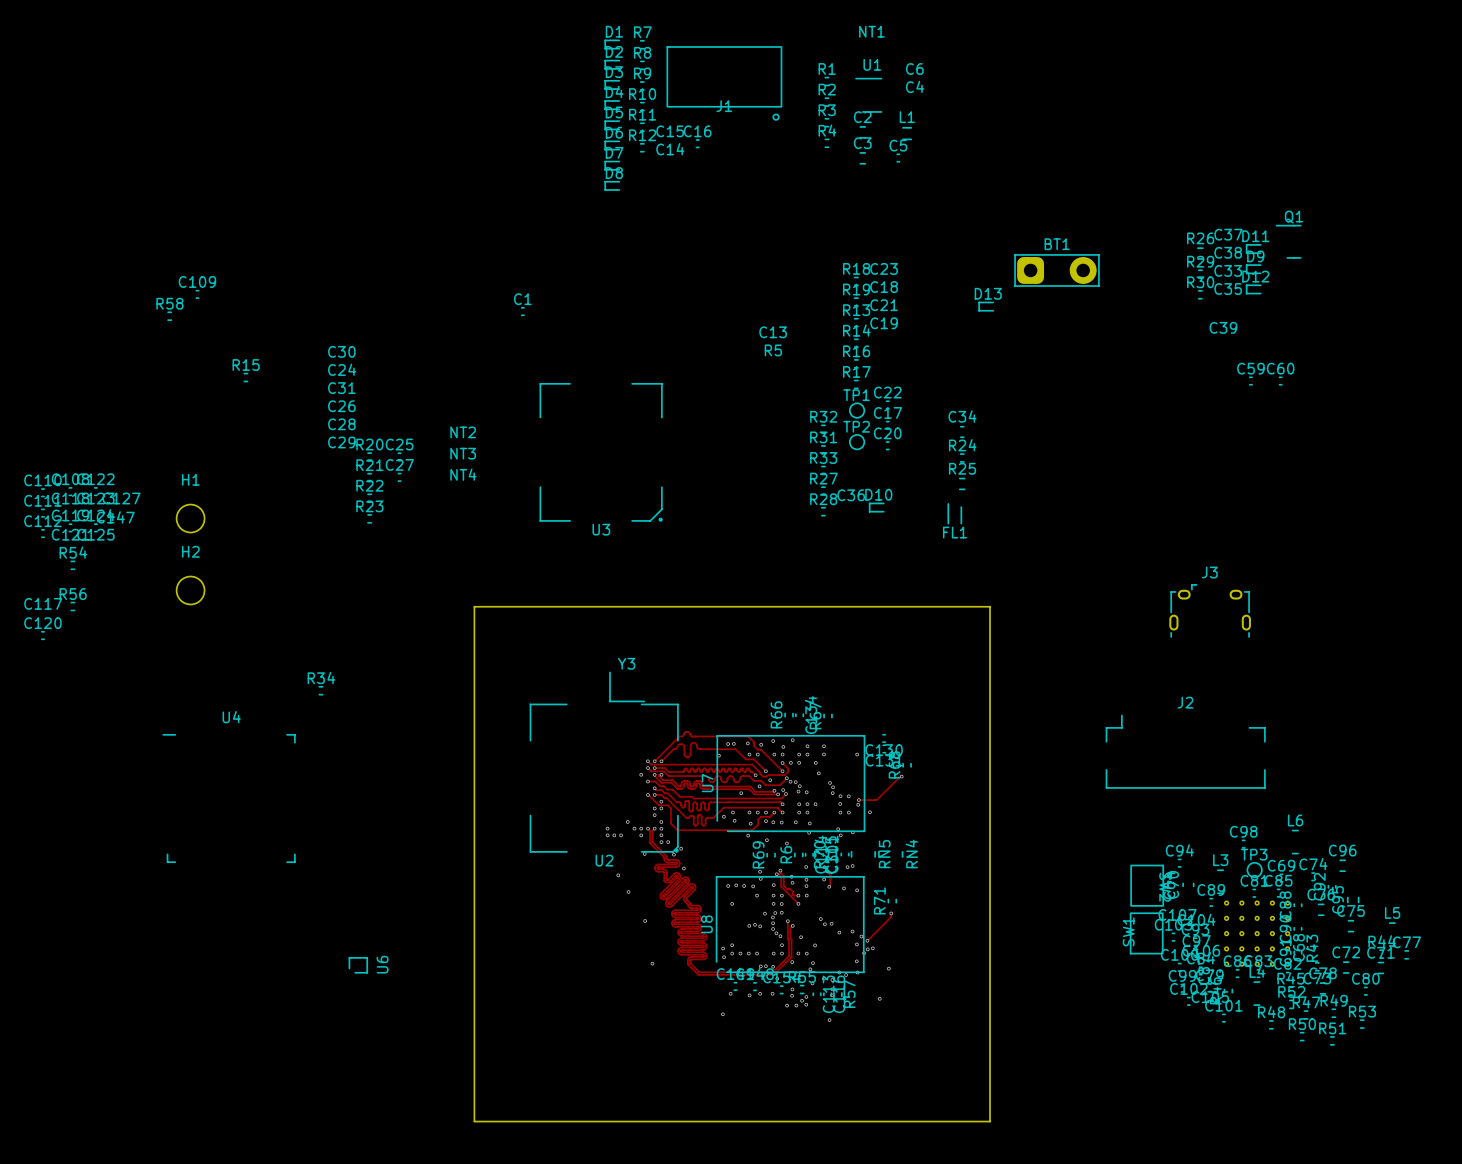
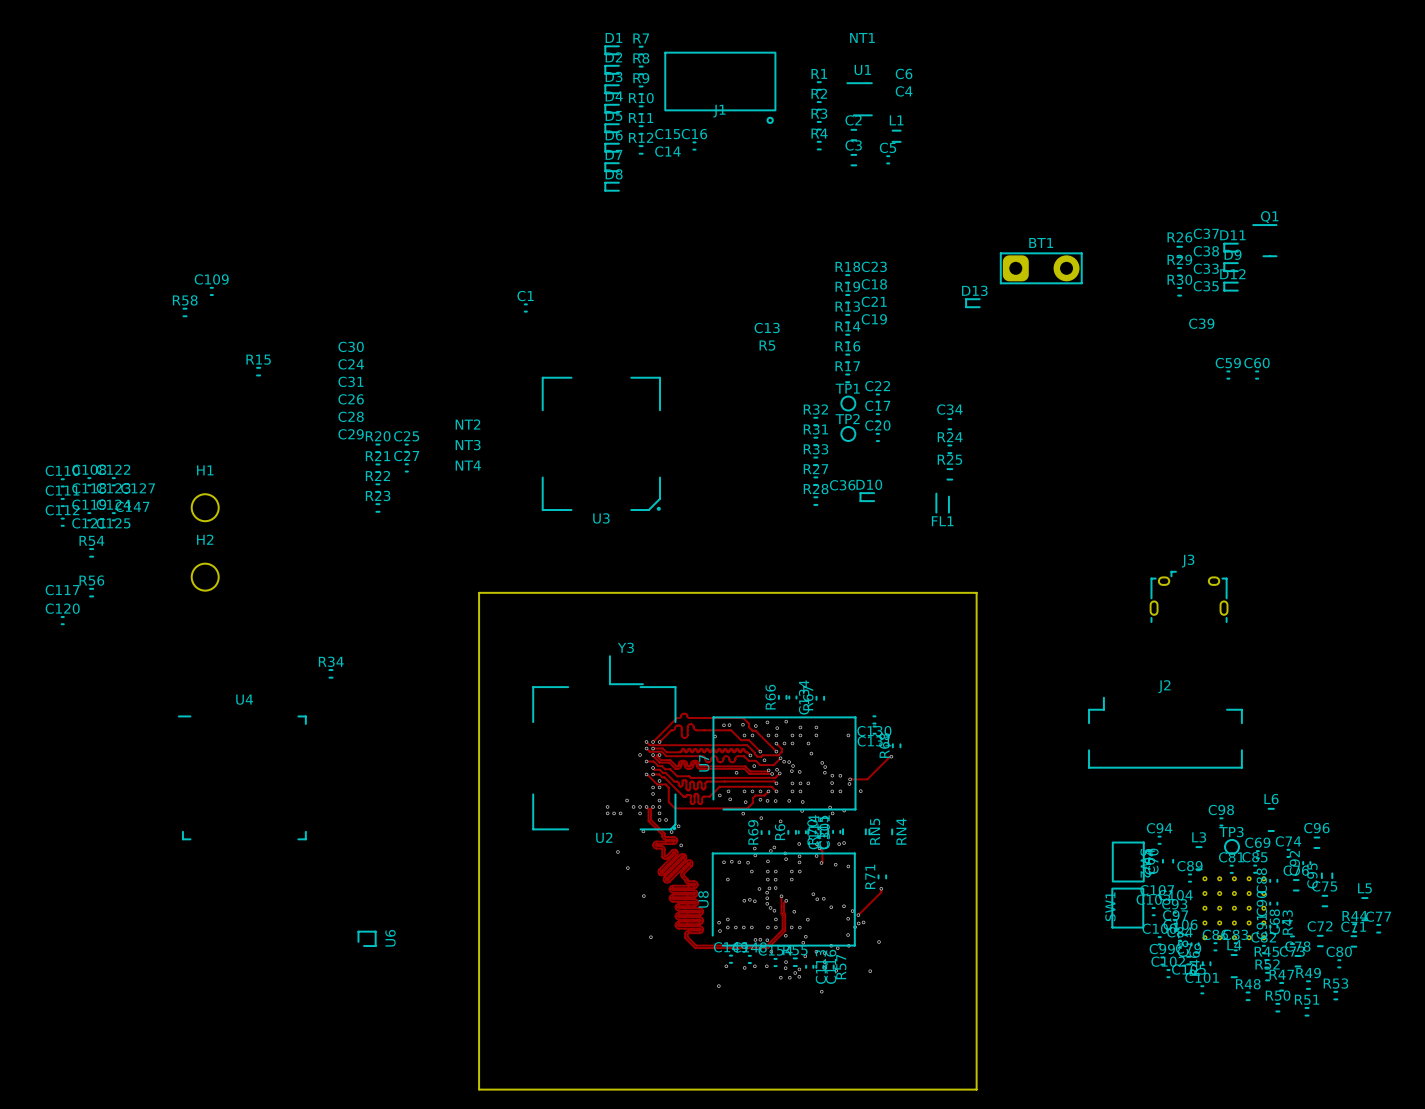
track: (780, 870) (783, 875) (783, 885) (790, 888) (793, 895) (798, 895) -> none
track: (776, 874) (781, 876) (781, 886) (798, 903) -> none

